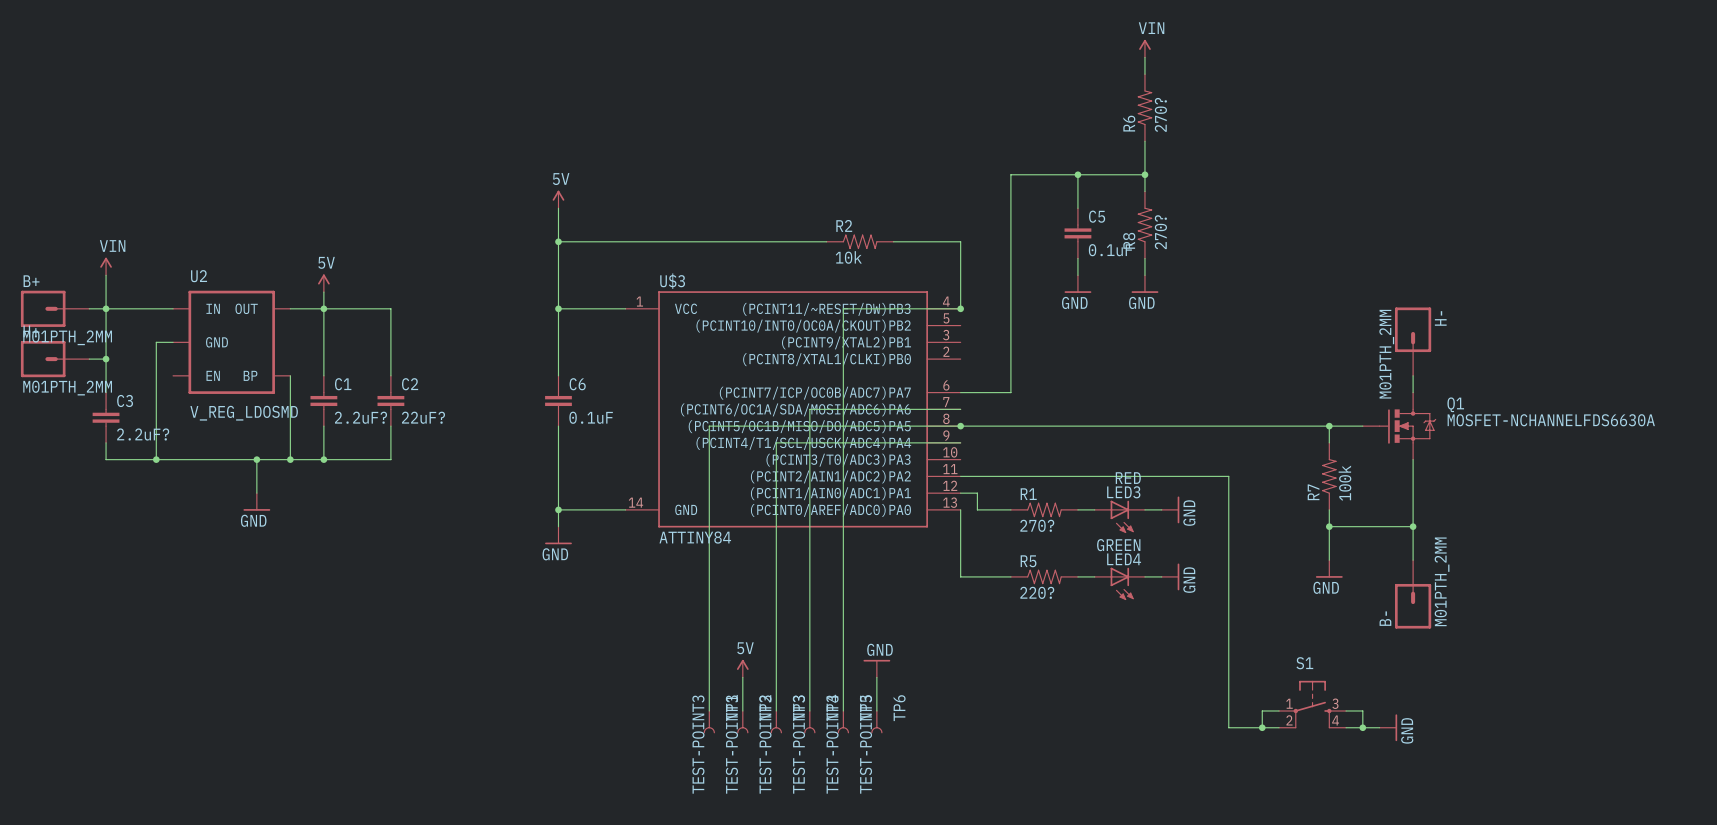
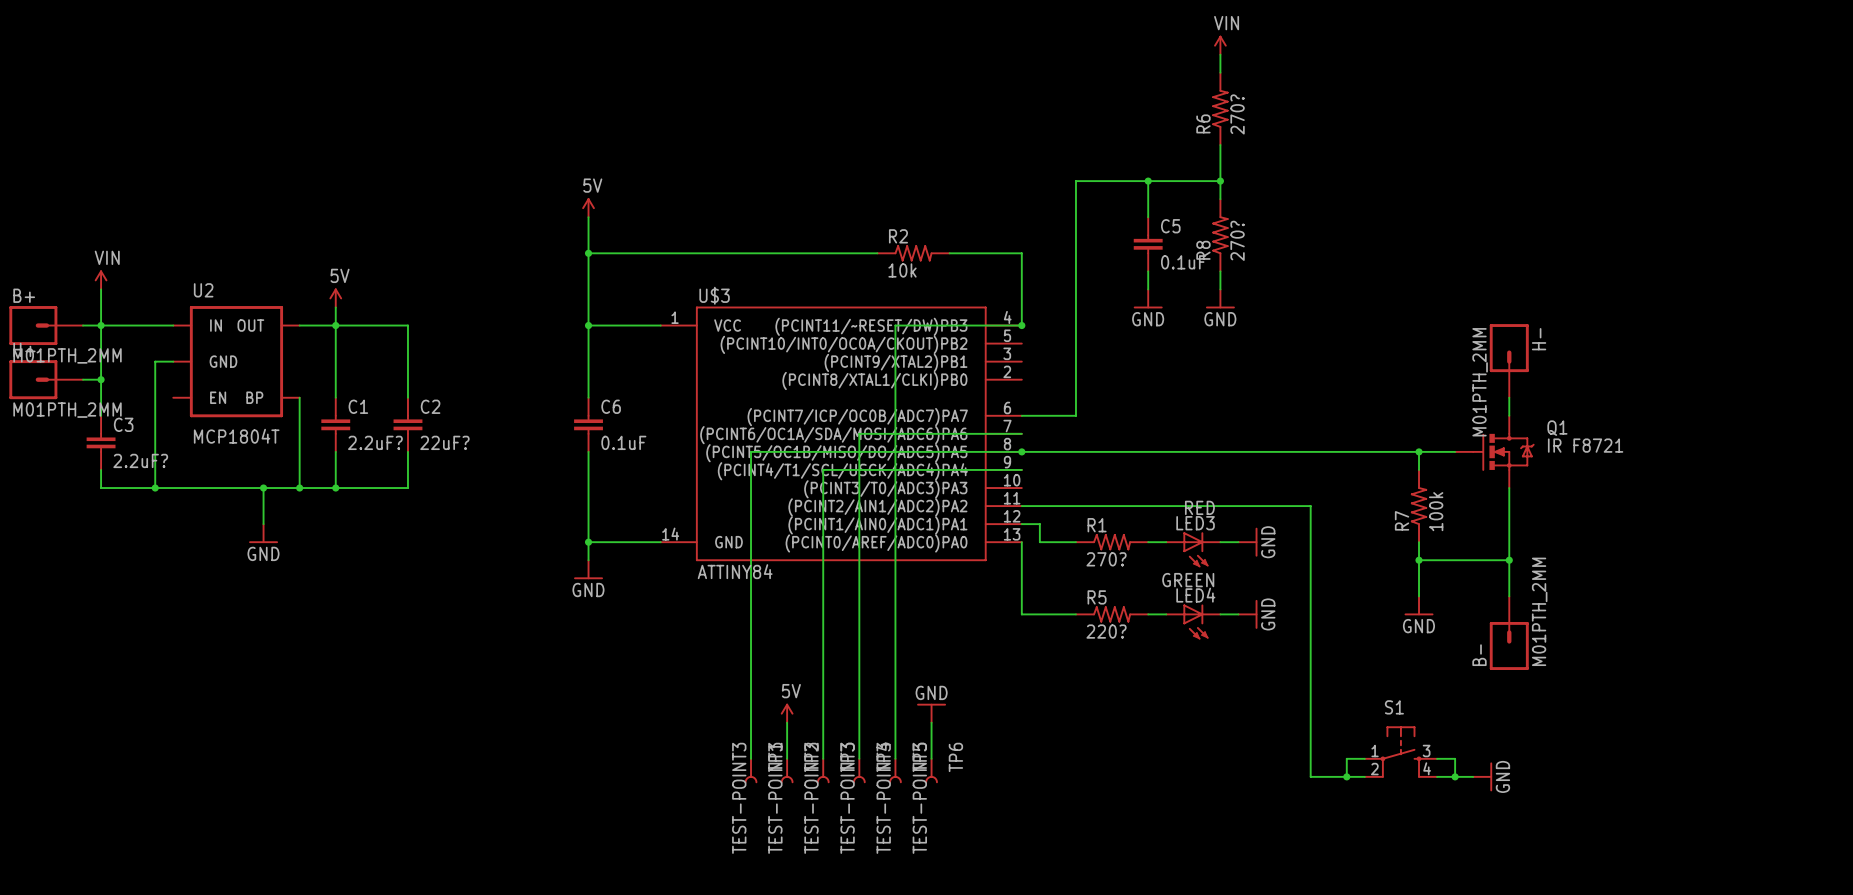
U2 value: V_REG_LDOSMD (244, 413) -> MCP1804T (236, 436)
Q1 value: MOSFET-NCHANNELFDS6630A (1551, 420) -> IR F8721 (1585, 445)

